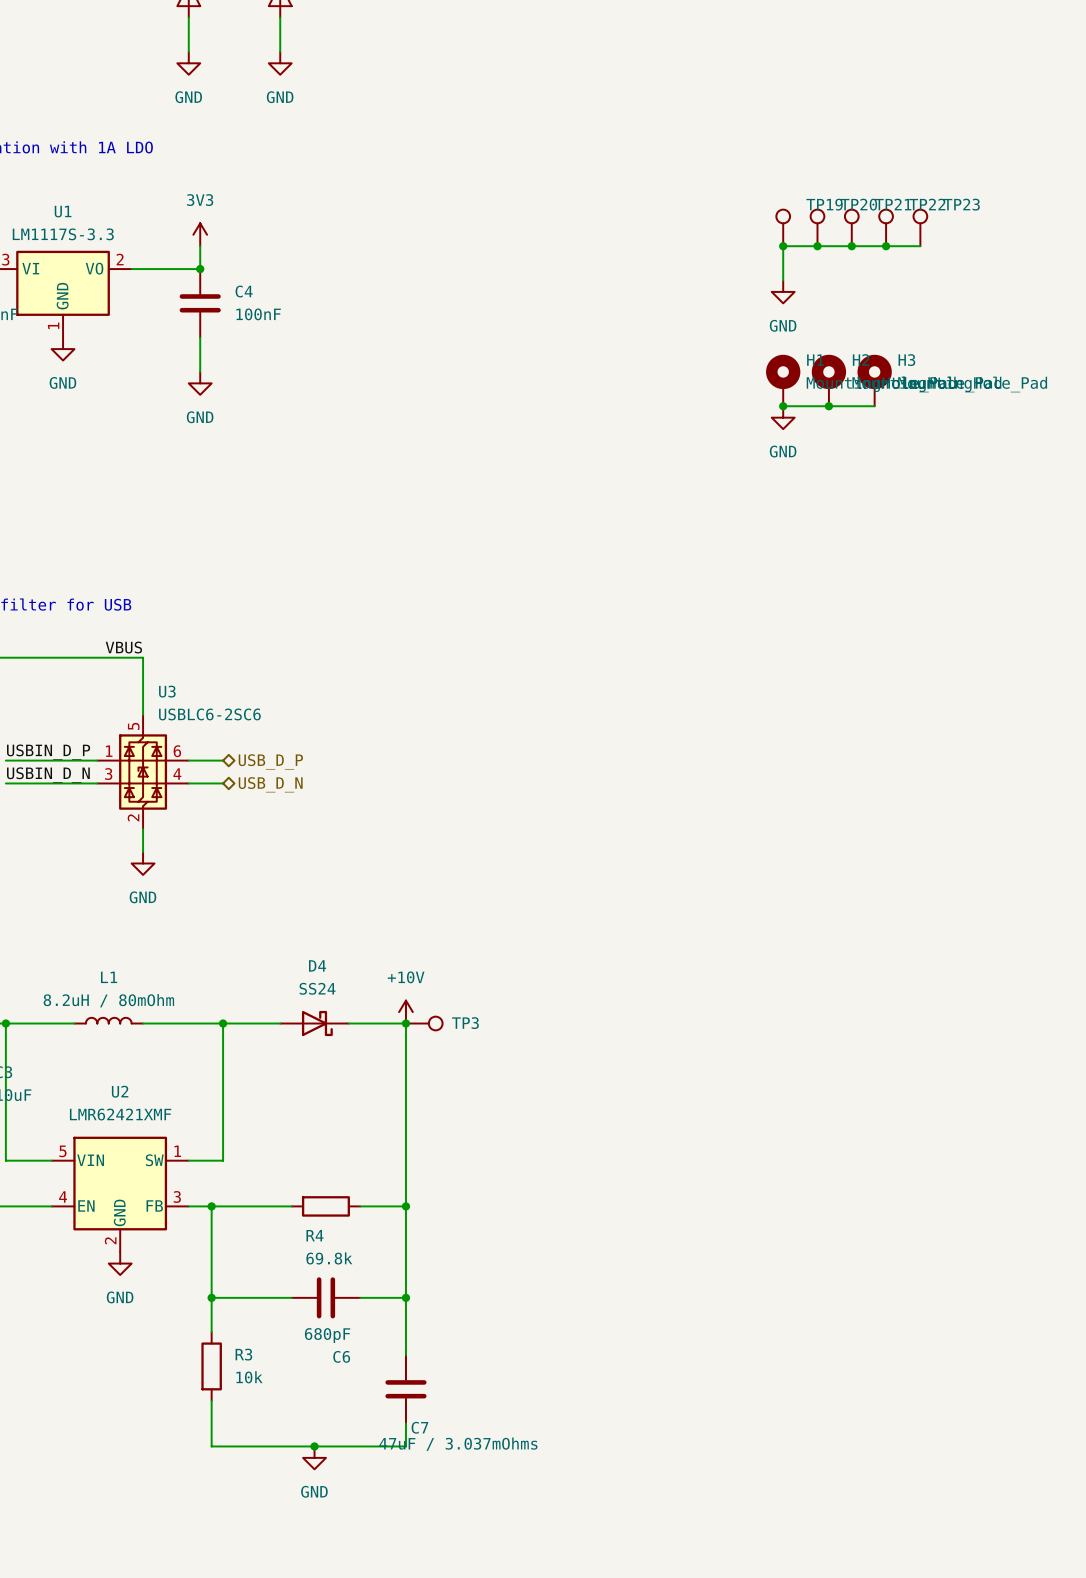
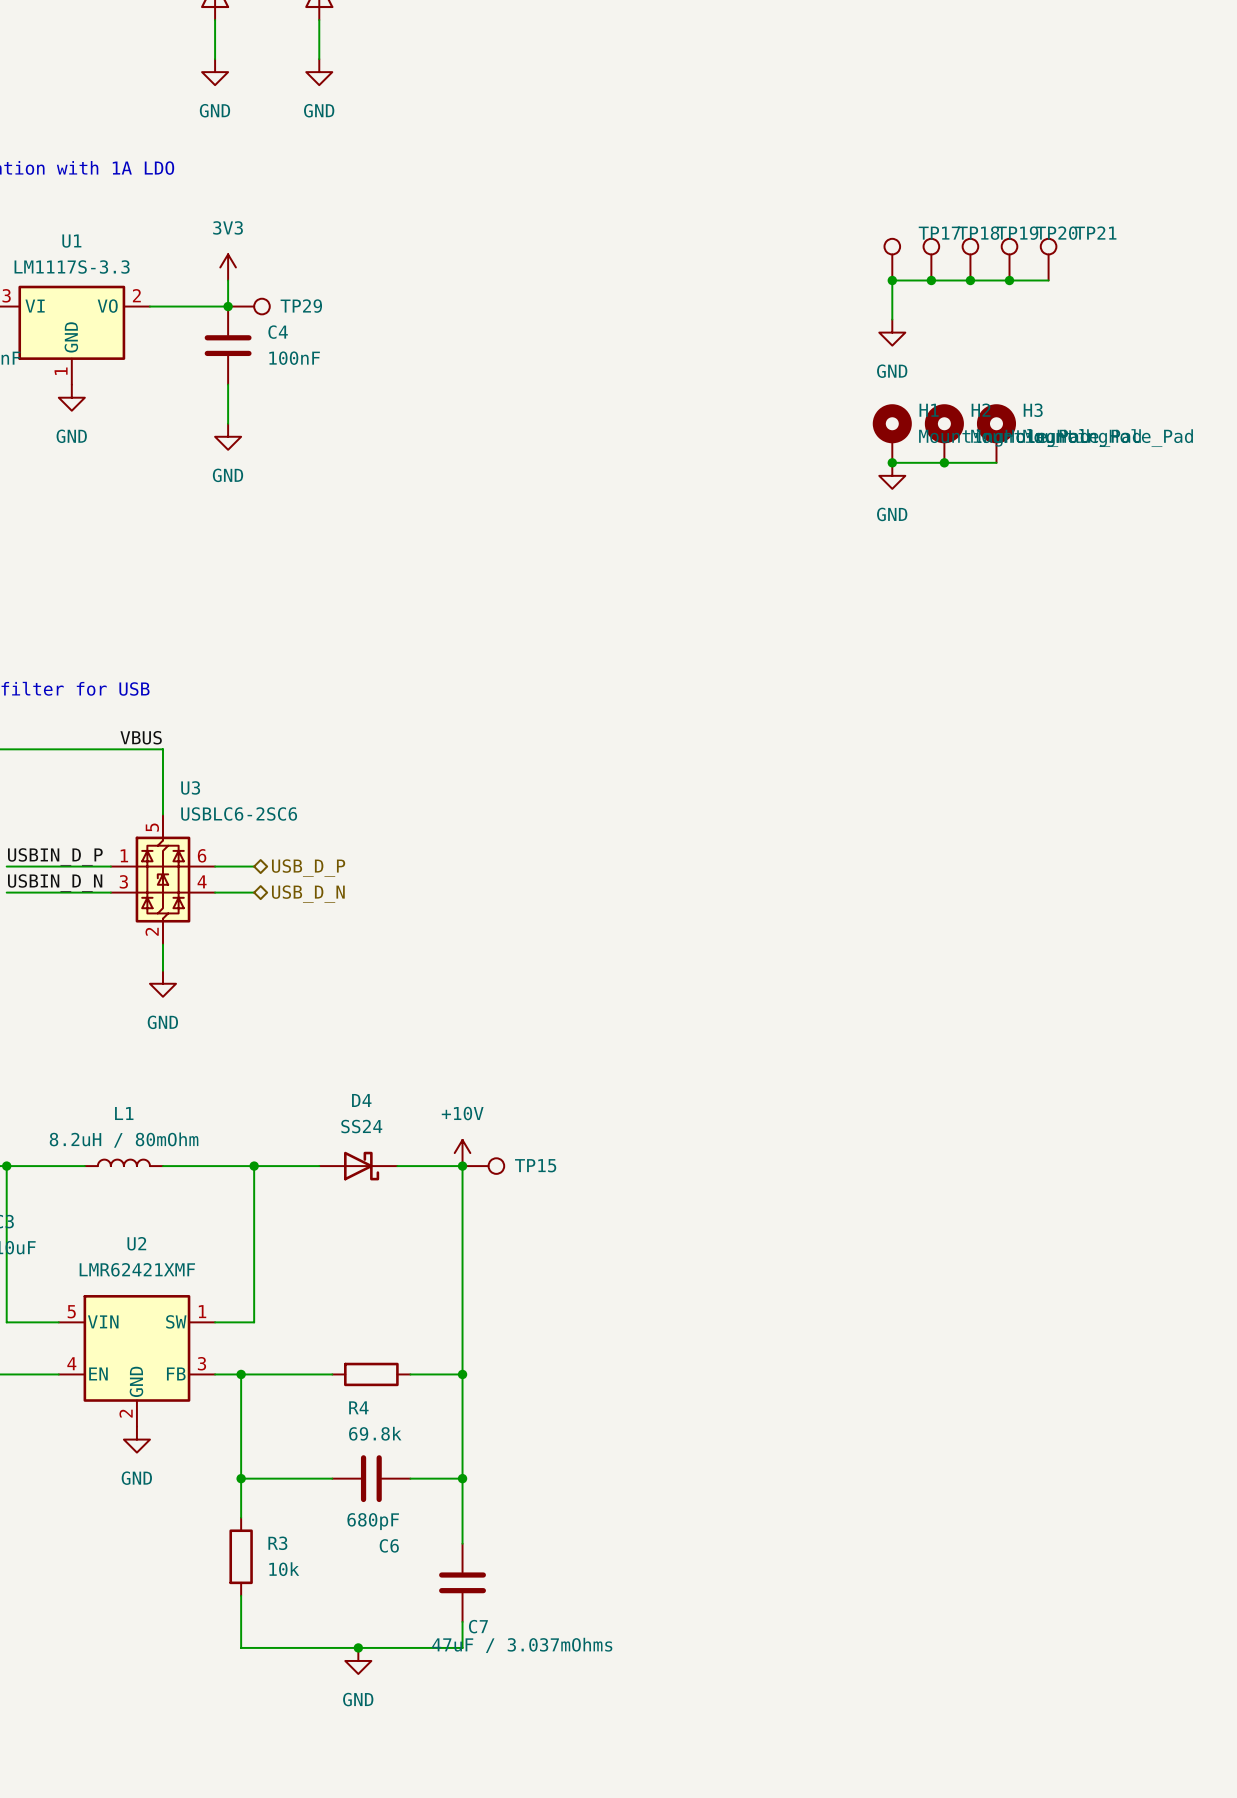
TP19 name: TP19 (824, 204) -> TP17 (939, 233)
TP20 name: TP20 (858, 204) -> TP18 (978, 233)
TP21 name: TP21 (893, 204) -> TP19 (1017, 233)
TP22 name: TP22 (927, 204) -> TP20 (1056, 233)
TP23 name: TP23 (961, 204) -> TP21 (1095, 233)
TP29: none -> (248, 306)
TP3 name: TP3 (465, 1023) -> TP15 (535, 1165)

